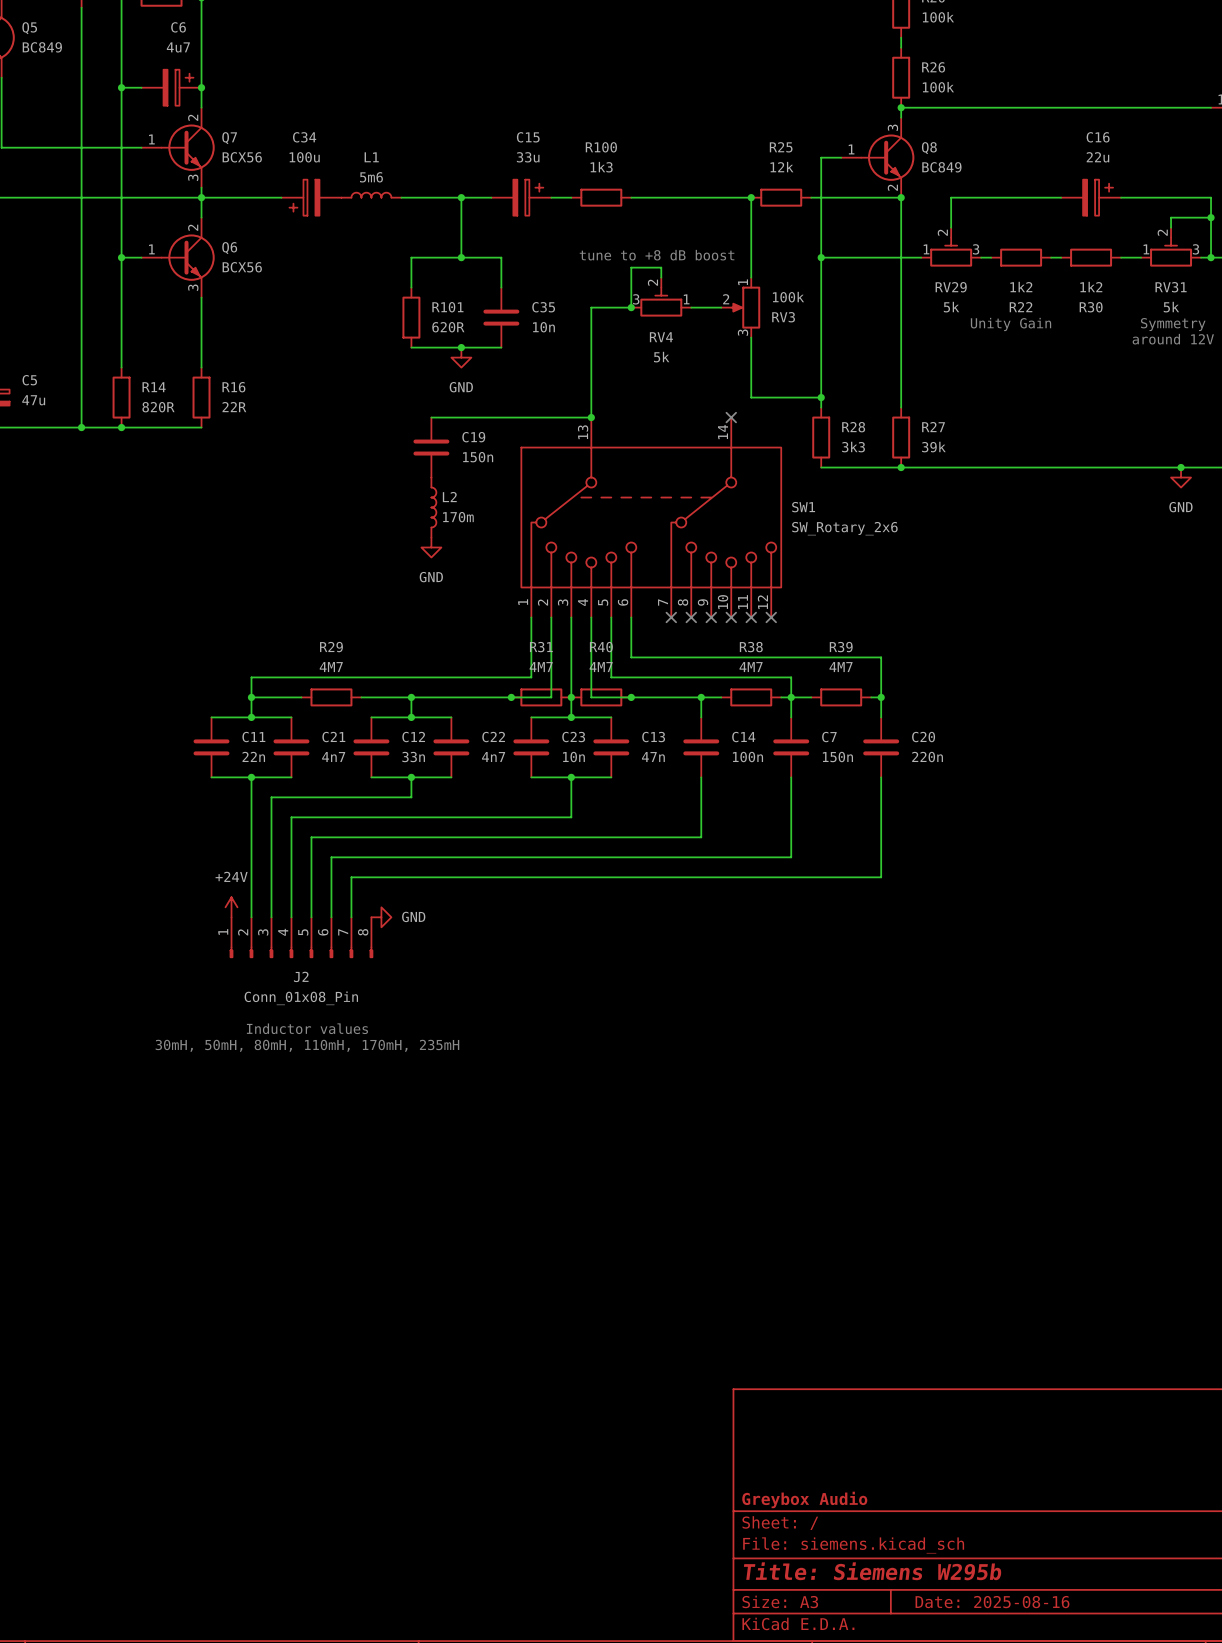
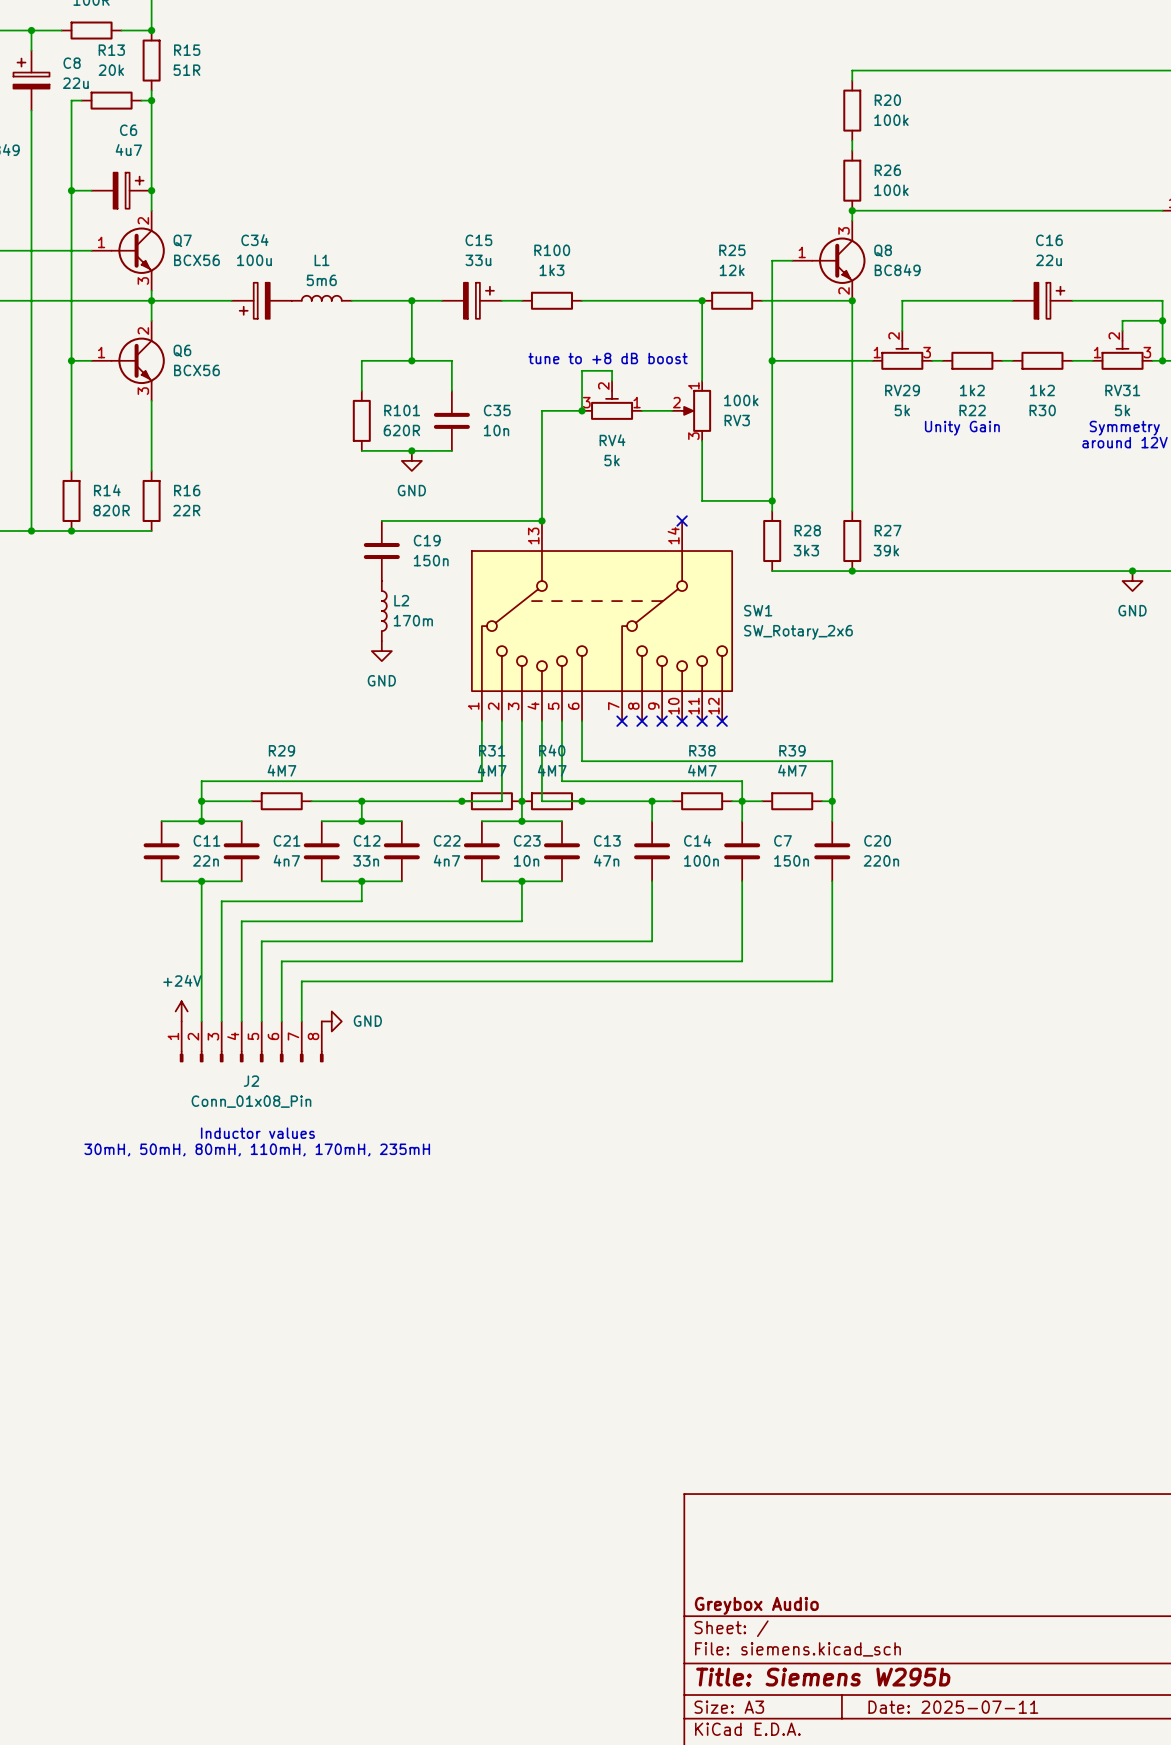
title block: Date: 2025-08-16 (992, 1602) -> Date: 2025-07-11 (953, 1707)

